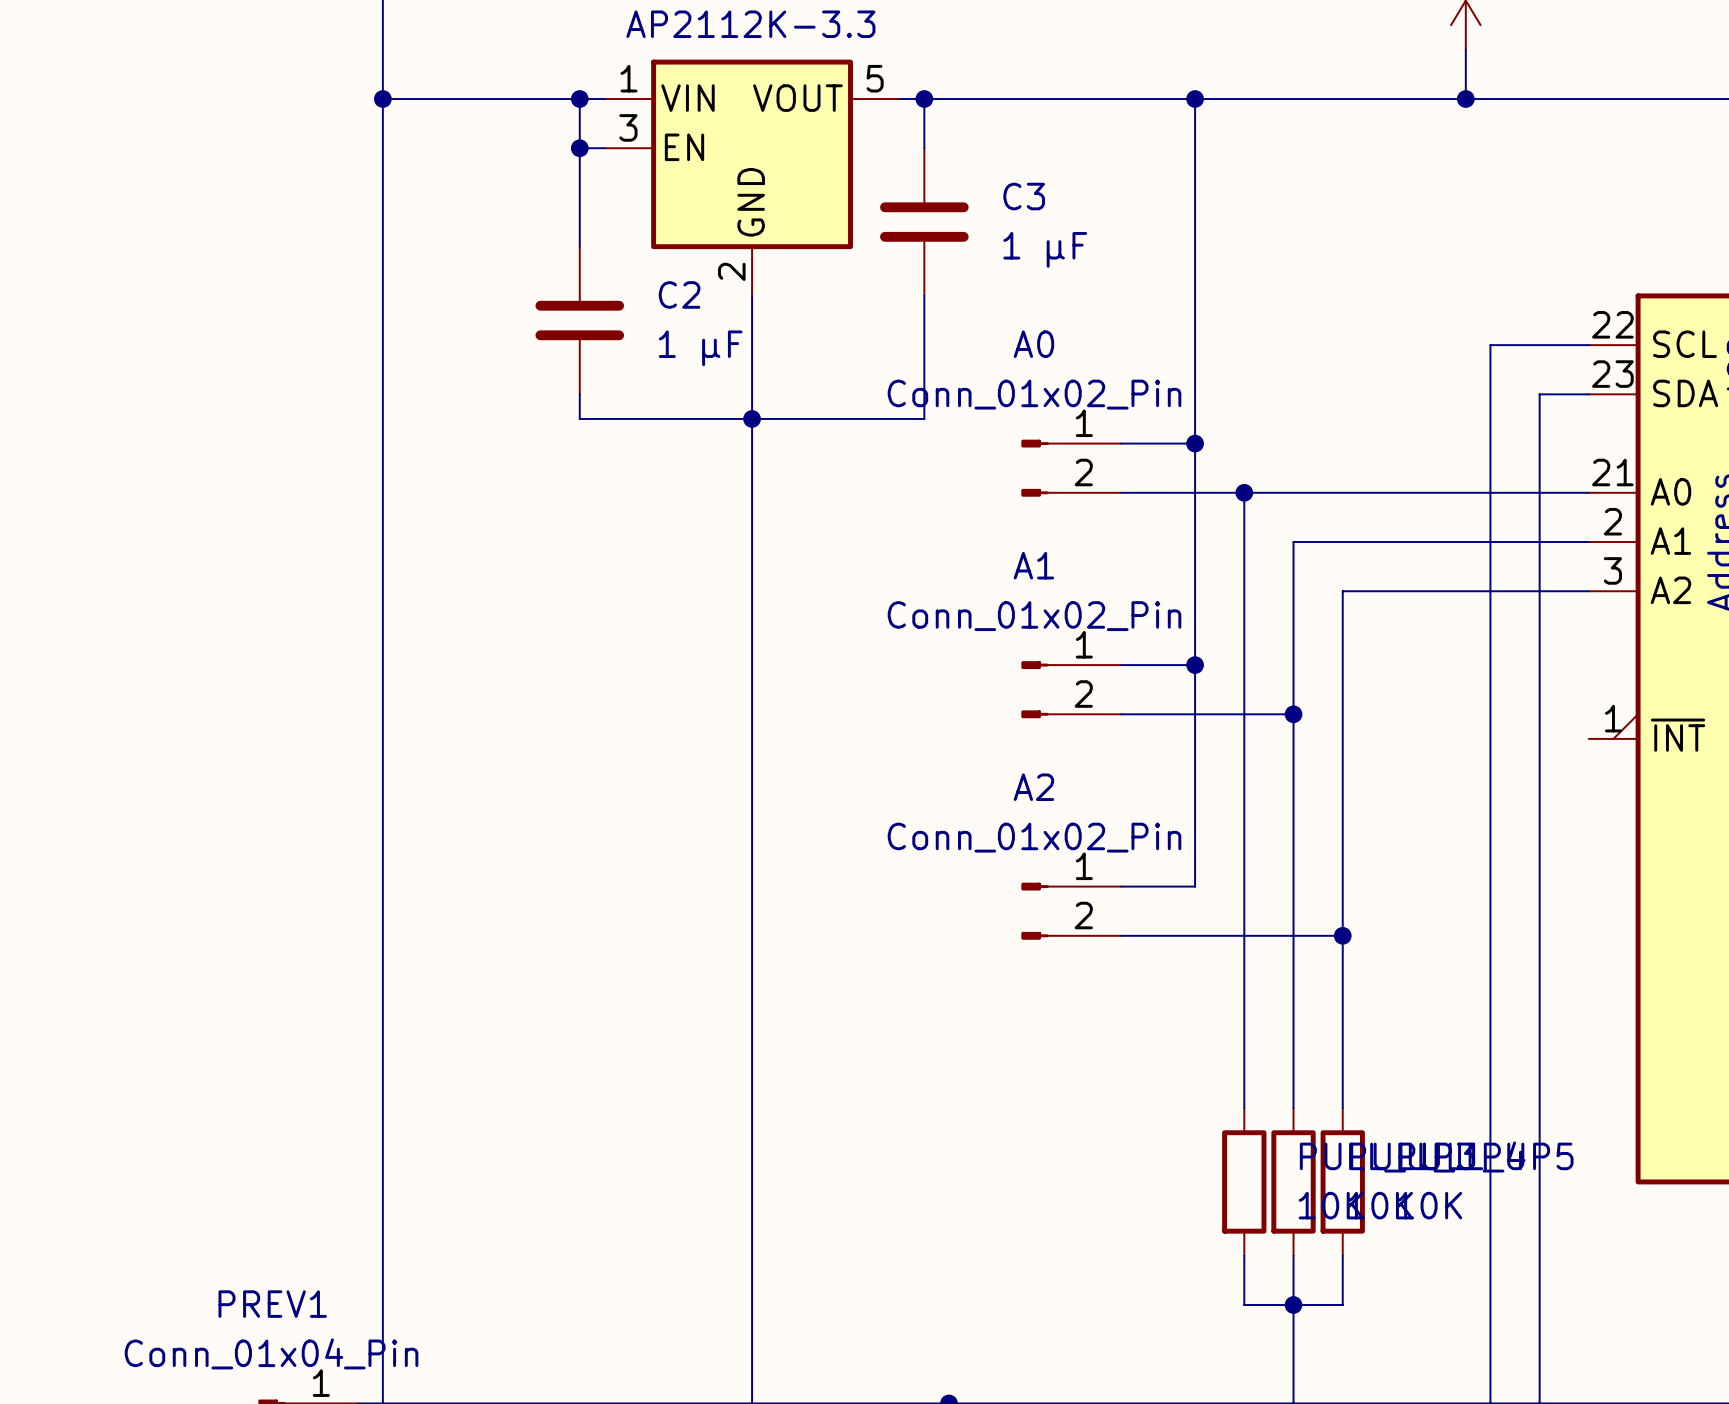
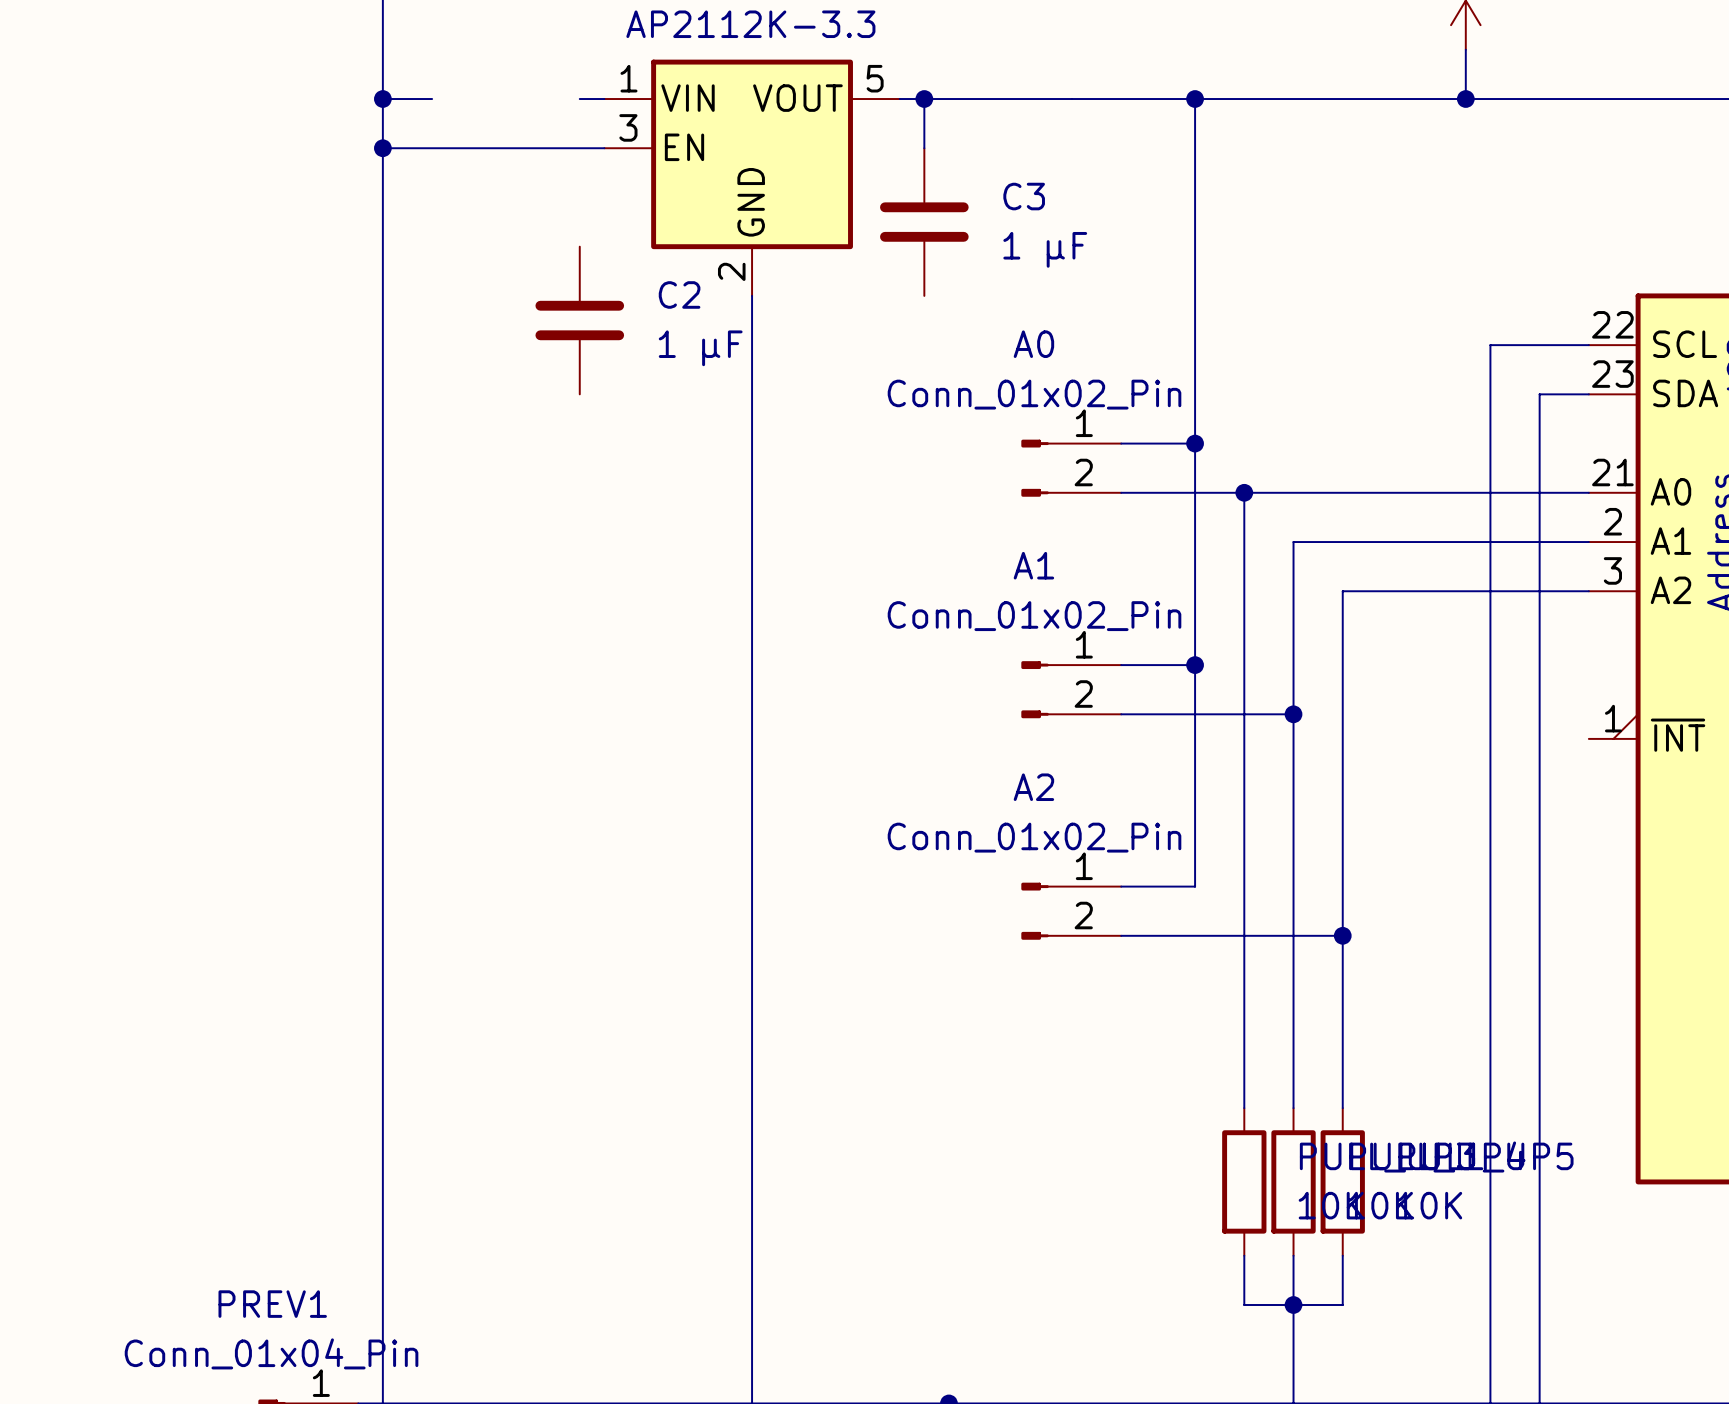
wire: (432, 99) (579, 99) (579, 246) -> none
junction: (579, 99) -> none
wire: none -> (382, 148) (579, 148)
junction: none -> (382, 148)
junction: (579, 148) -> none
wire: (924, 295) (924, 418) (579, 418) (579, 394) -> none
junction: (752, 418) -> none

